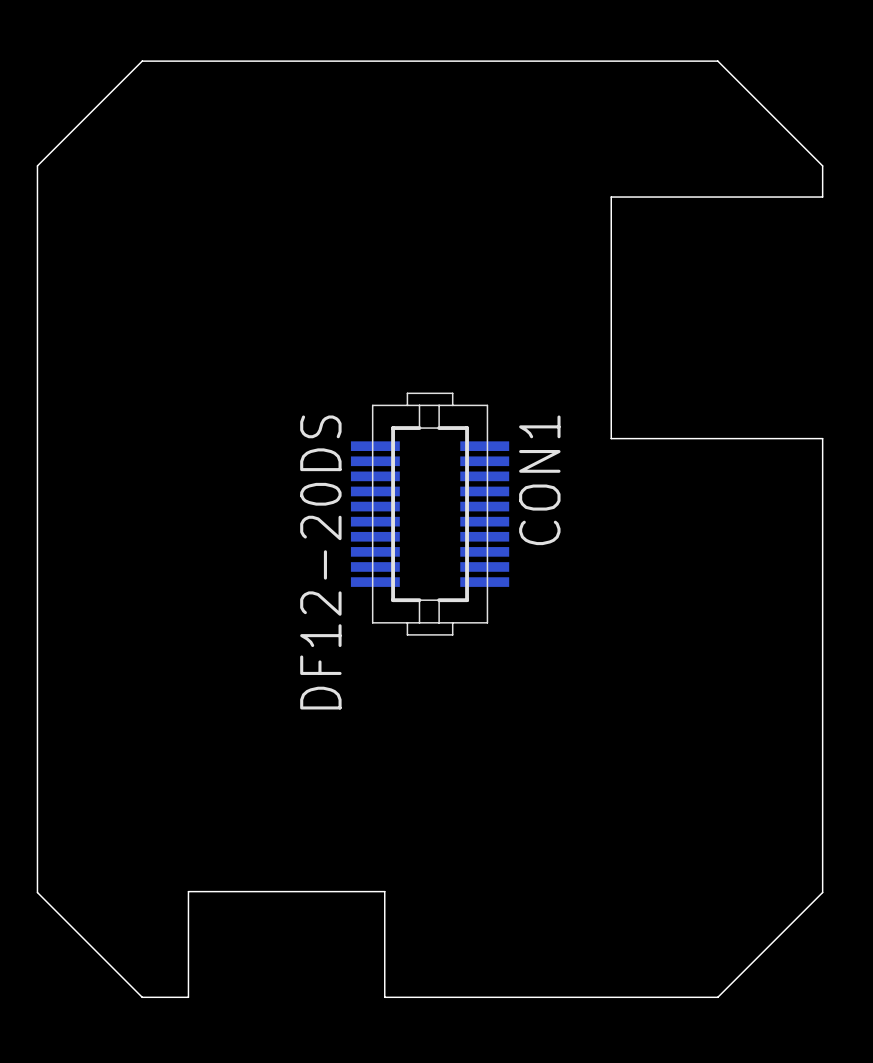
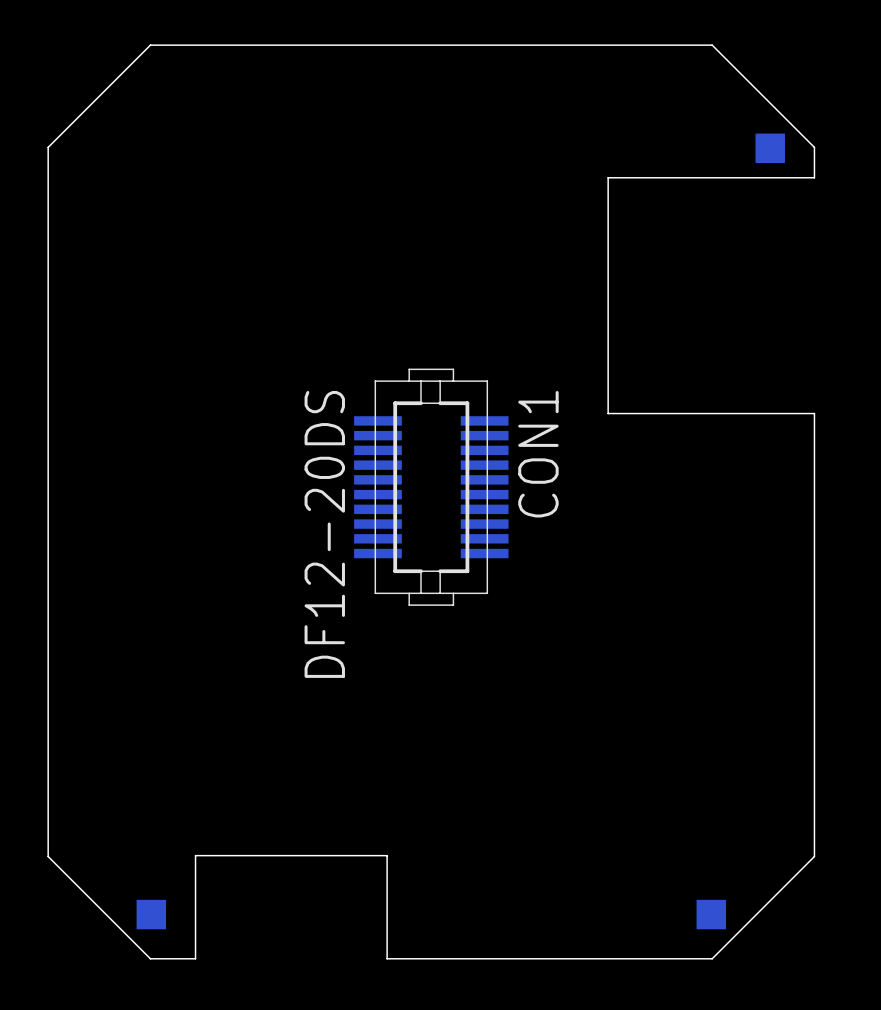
drawing: none -> [755, 133, 785, 164]
drawing: none -> [136, 899, 167, 930]
drawing: none -> [696, 899, 727, 930]

